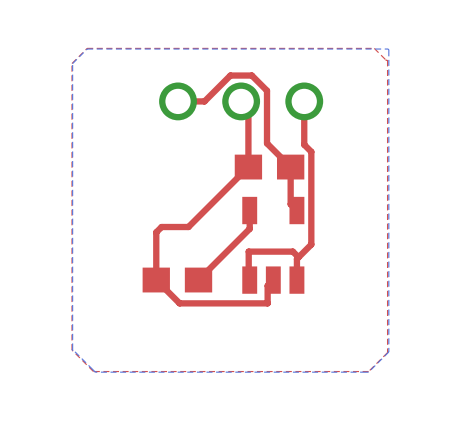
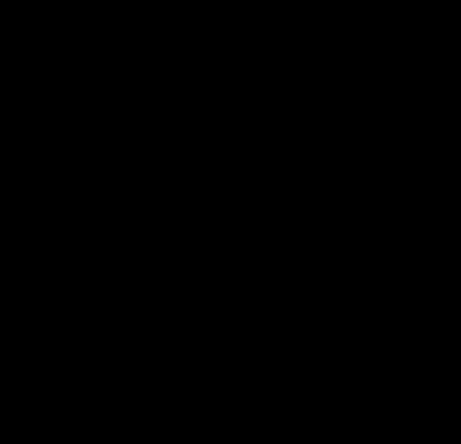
top zone outline: (374, 48) (87, 48) (72, 63) (72, 350) (93, 371) (368, 371) (387, 352) (387, 60) (374, 48) -> none
bottom zone outline: (388, 49) (87, 49) (72, 63) (72, 350) (95, 372) (368, 372) (388, 351) (388, 49) -> none
top track: (178, 101) (204, 101) (230, 75) (251, 75) (267, 90) (267, 143) (290, 167) (290, 204) (296, 210) -> none
top track: (241, 101) (248, 108) (248, 167) (188, 227) (161, 227) (156, 232) (156, 280) (179, 303) (267, 303) (267, 285) (273, 280) -> none
part: (241, 101) -> none
top track: (304, 101) (304, 144) (311, 151) (311, 244) (296, 258) (296, 280) -> none
part: (269, 167) -> none
top track: (249, 210) (249, 228) (198, 280) -> none
part: (273, 245) -> none
top track: (298, 257) (292, 251) (248, 251) (249, 280) -> none
part: (177, 280) -> none

